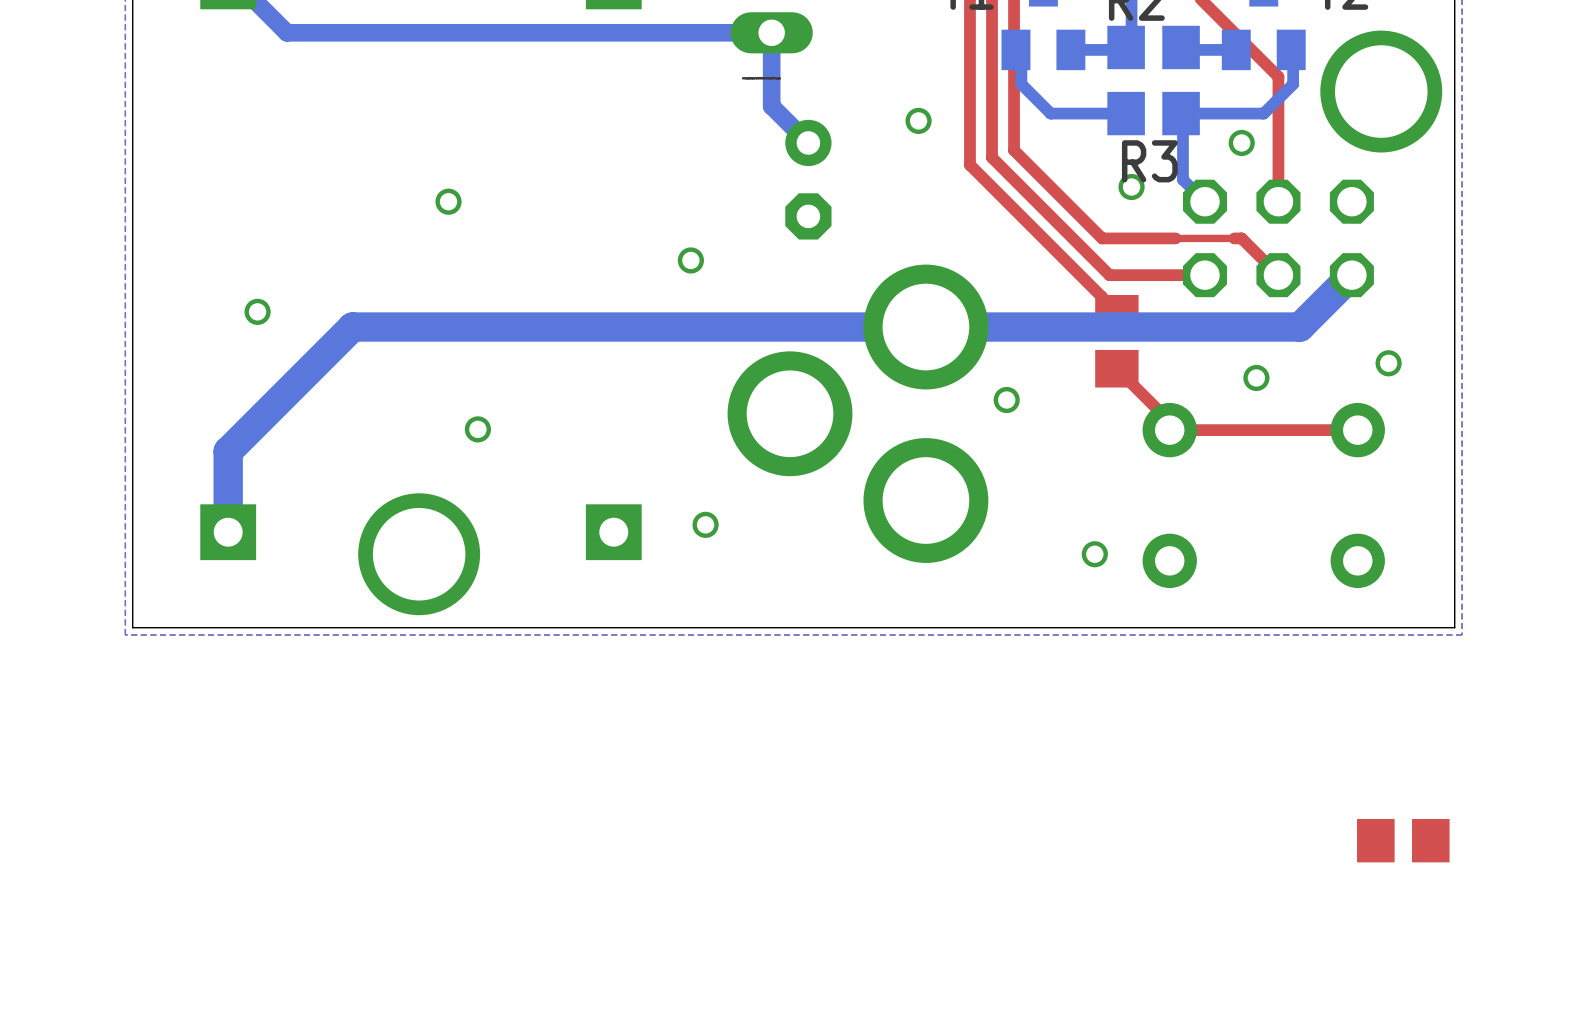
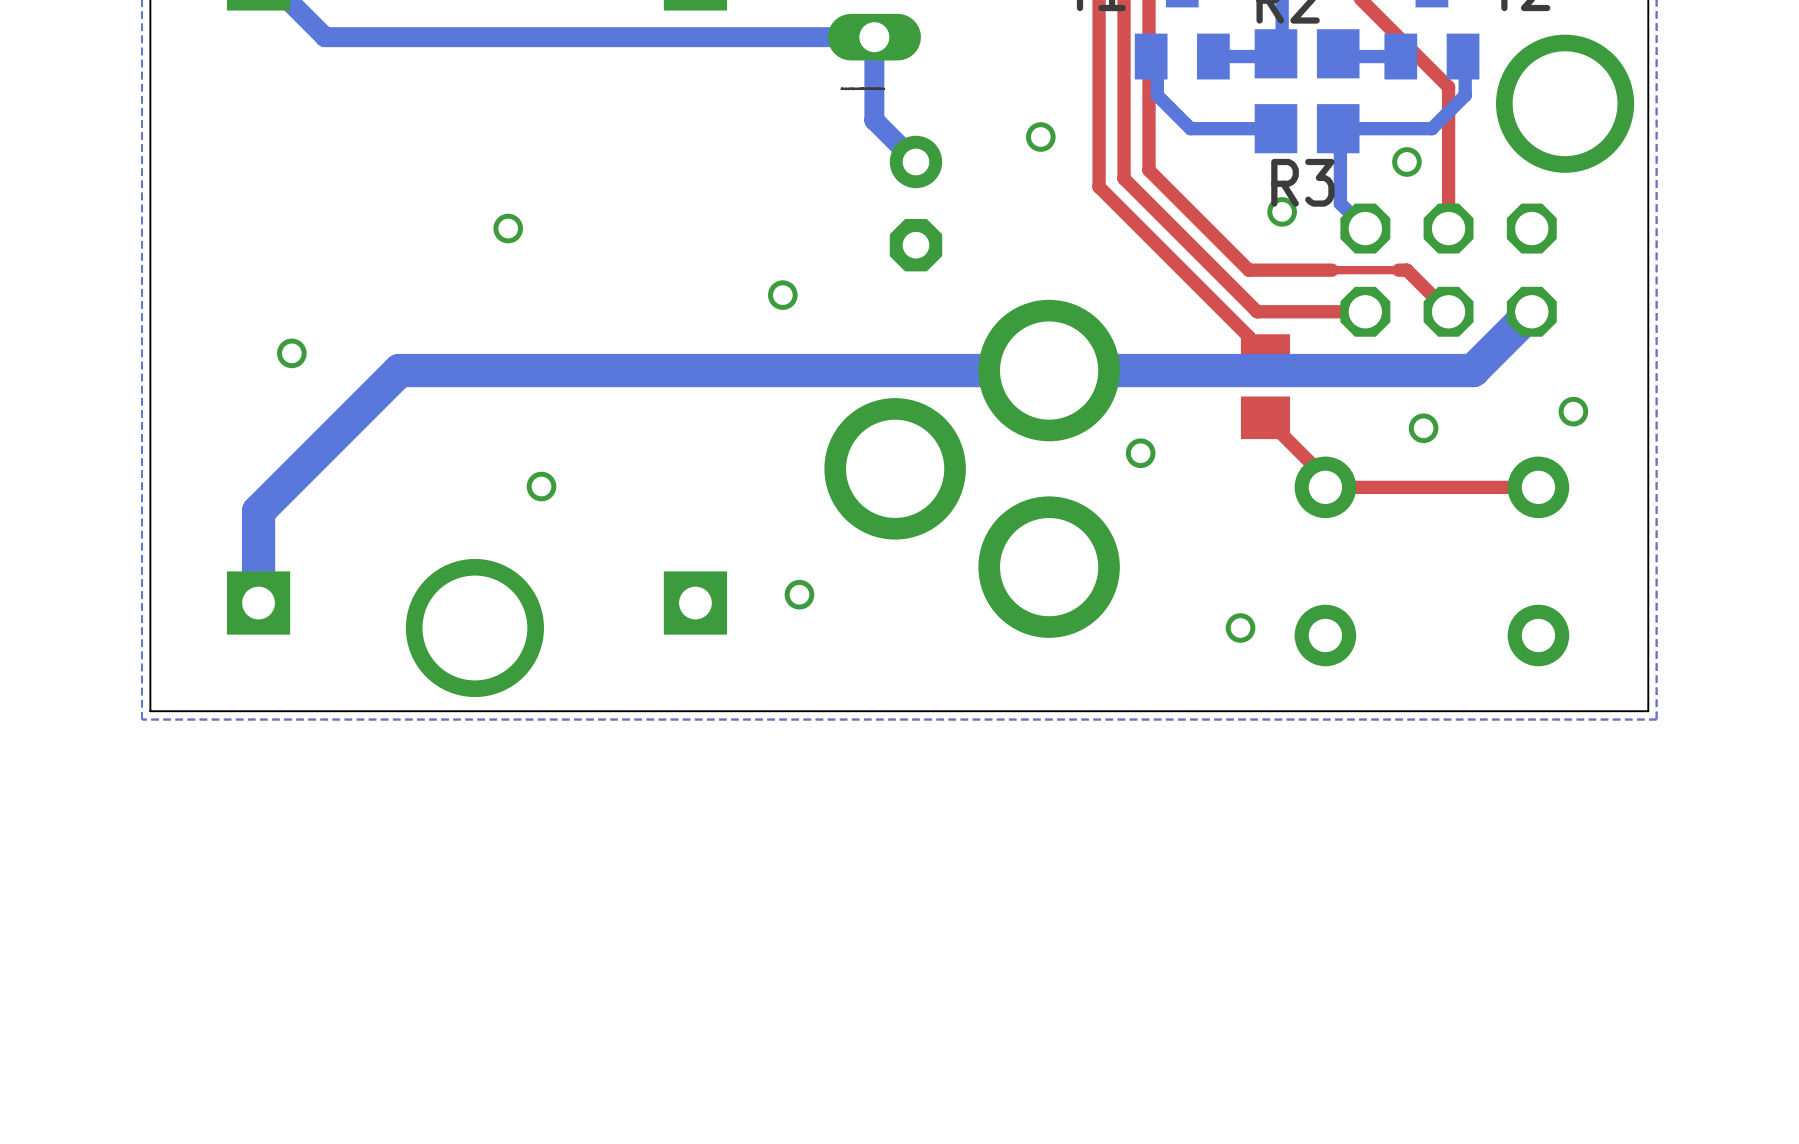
part: (1403, 840) -> none

